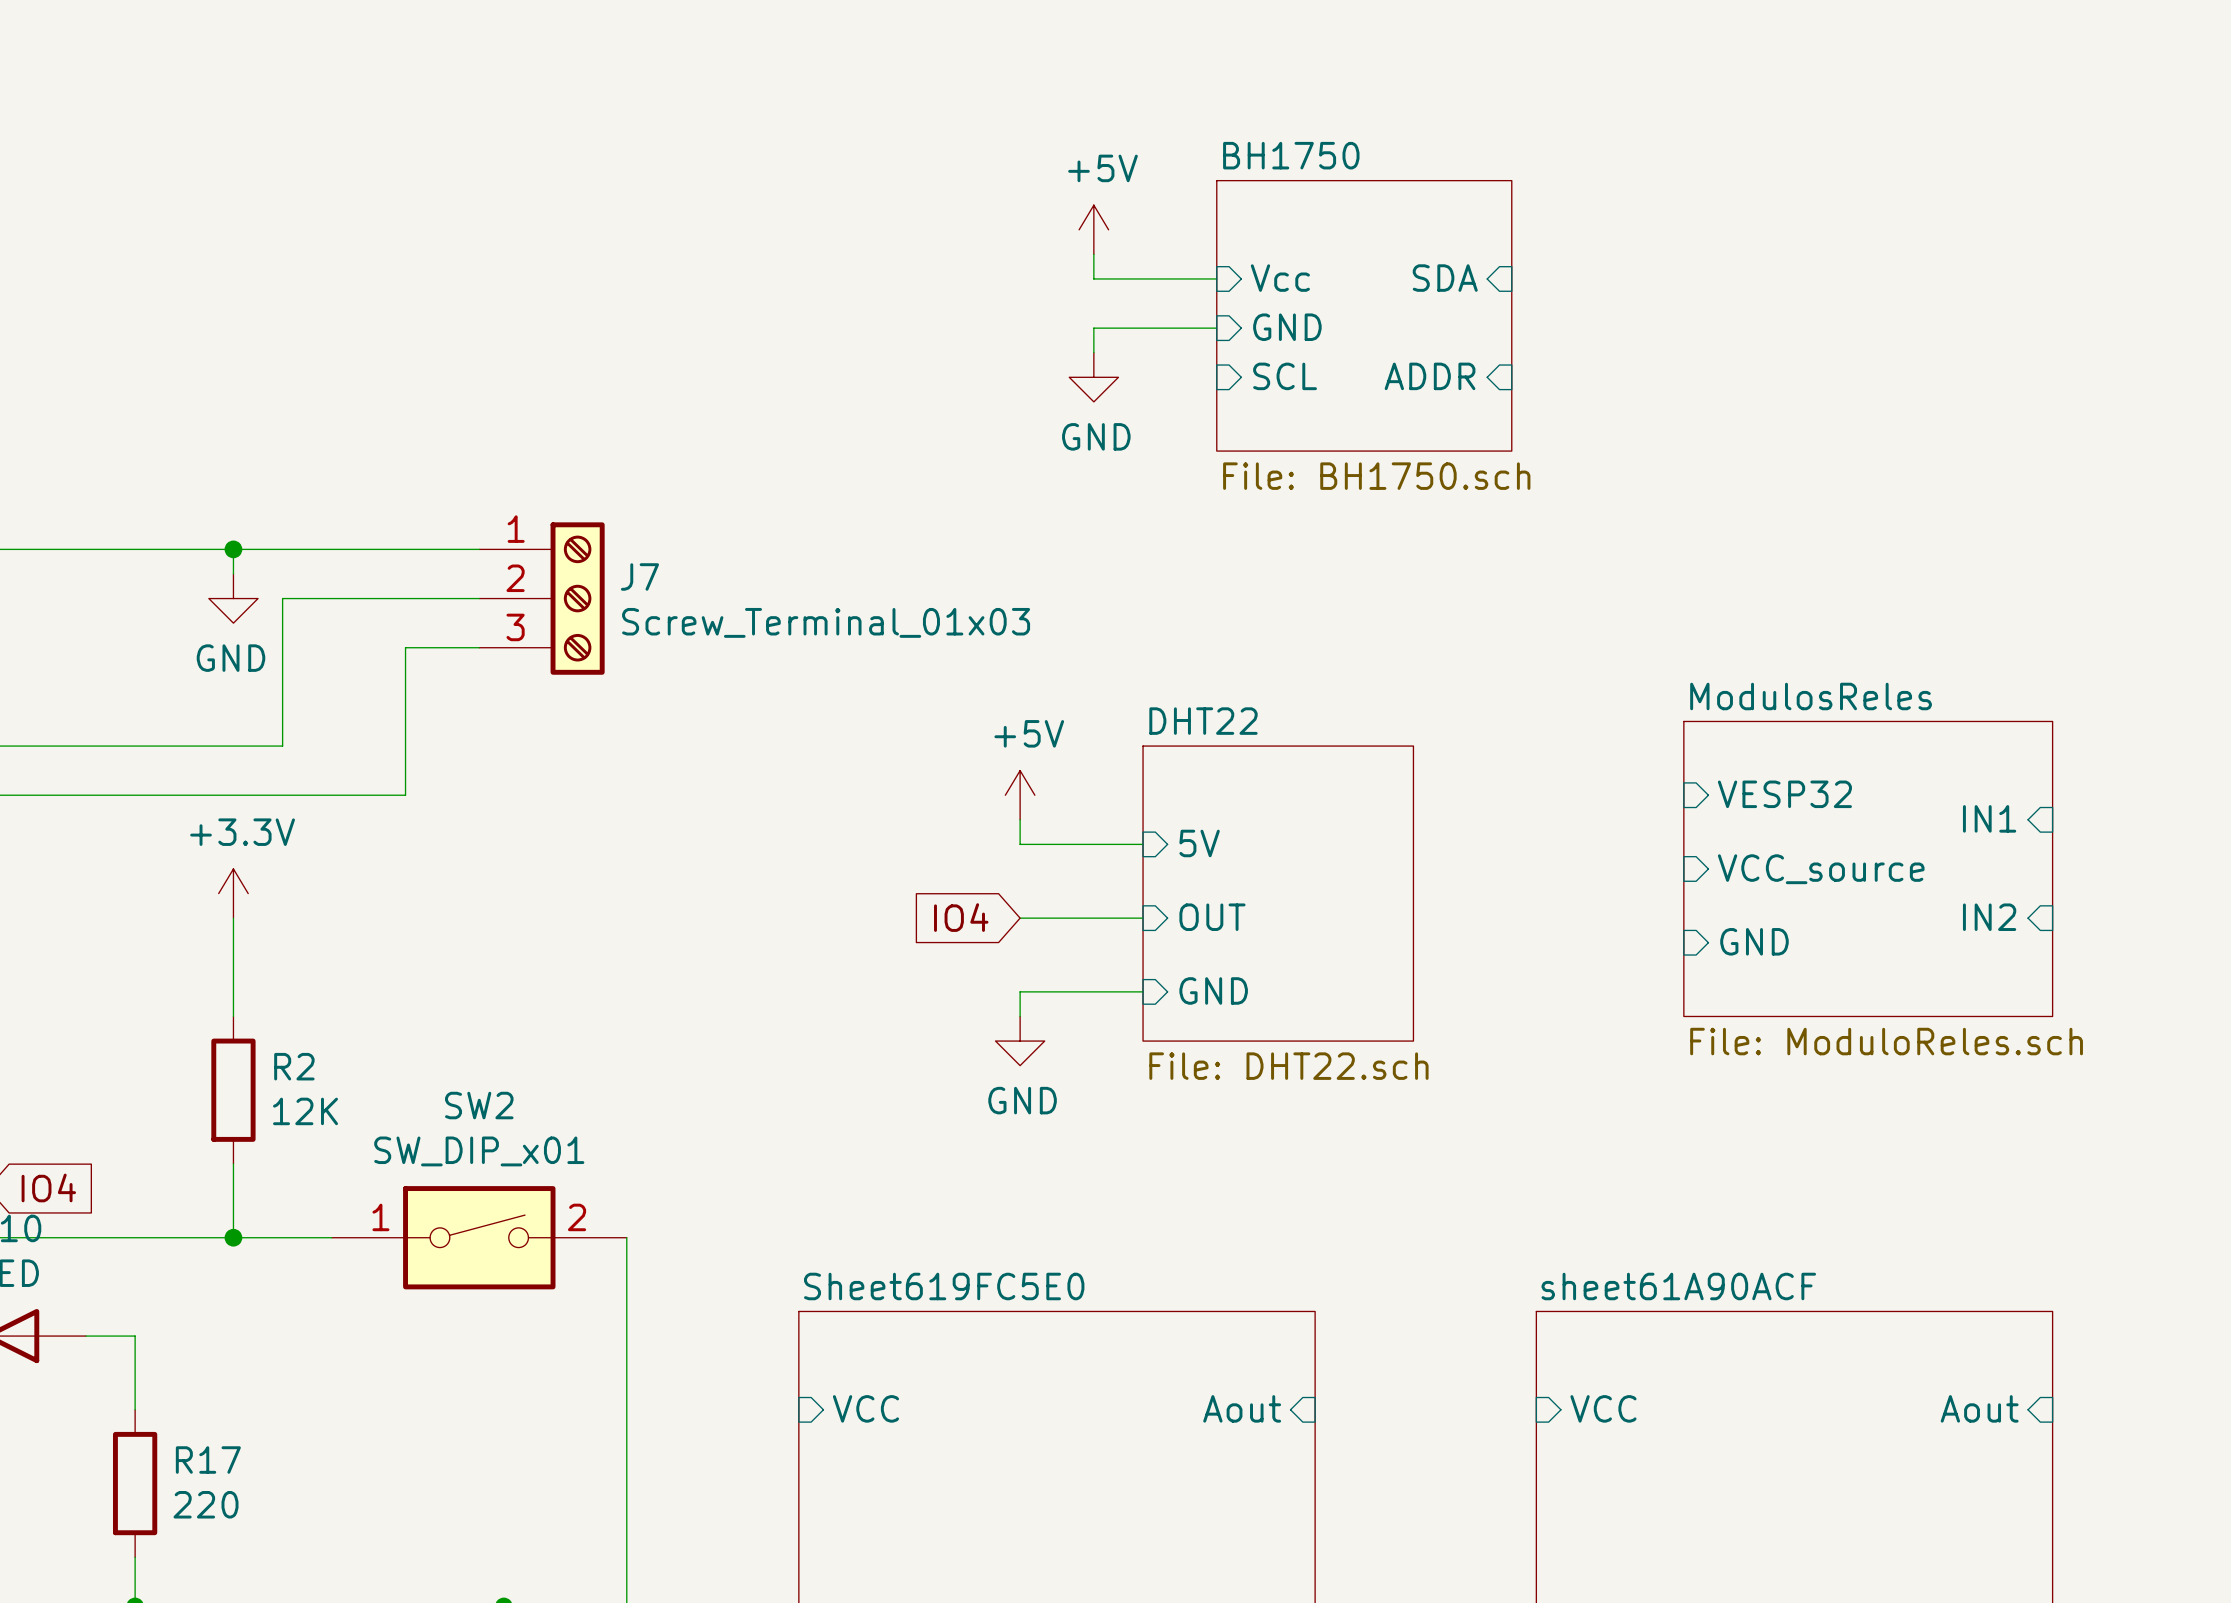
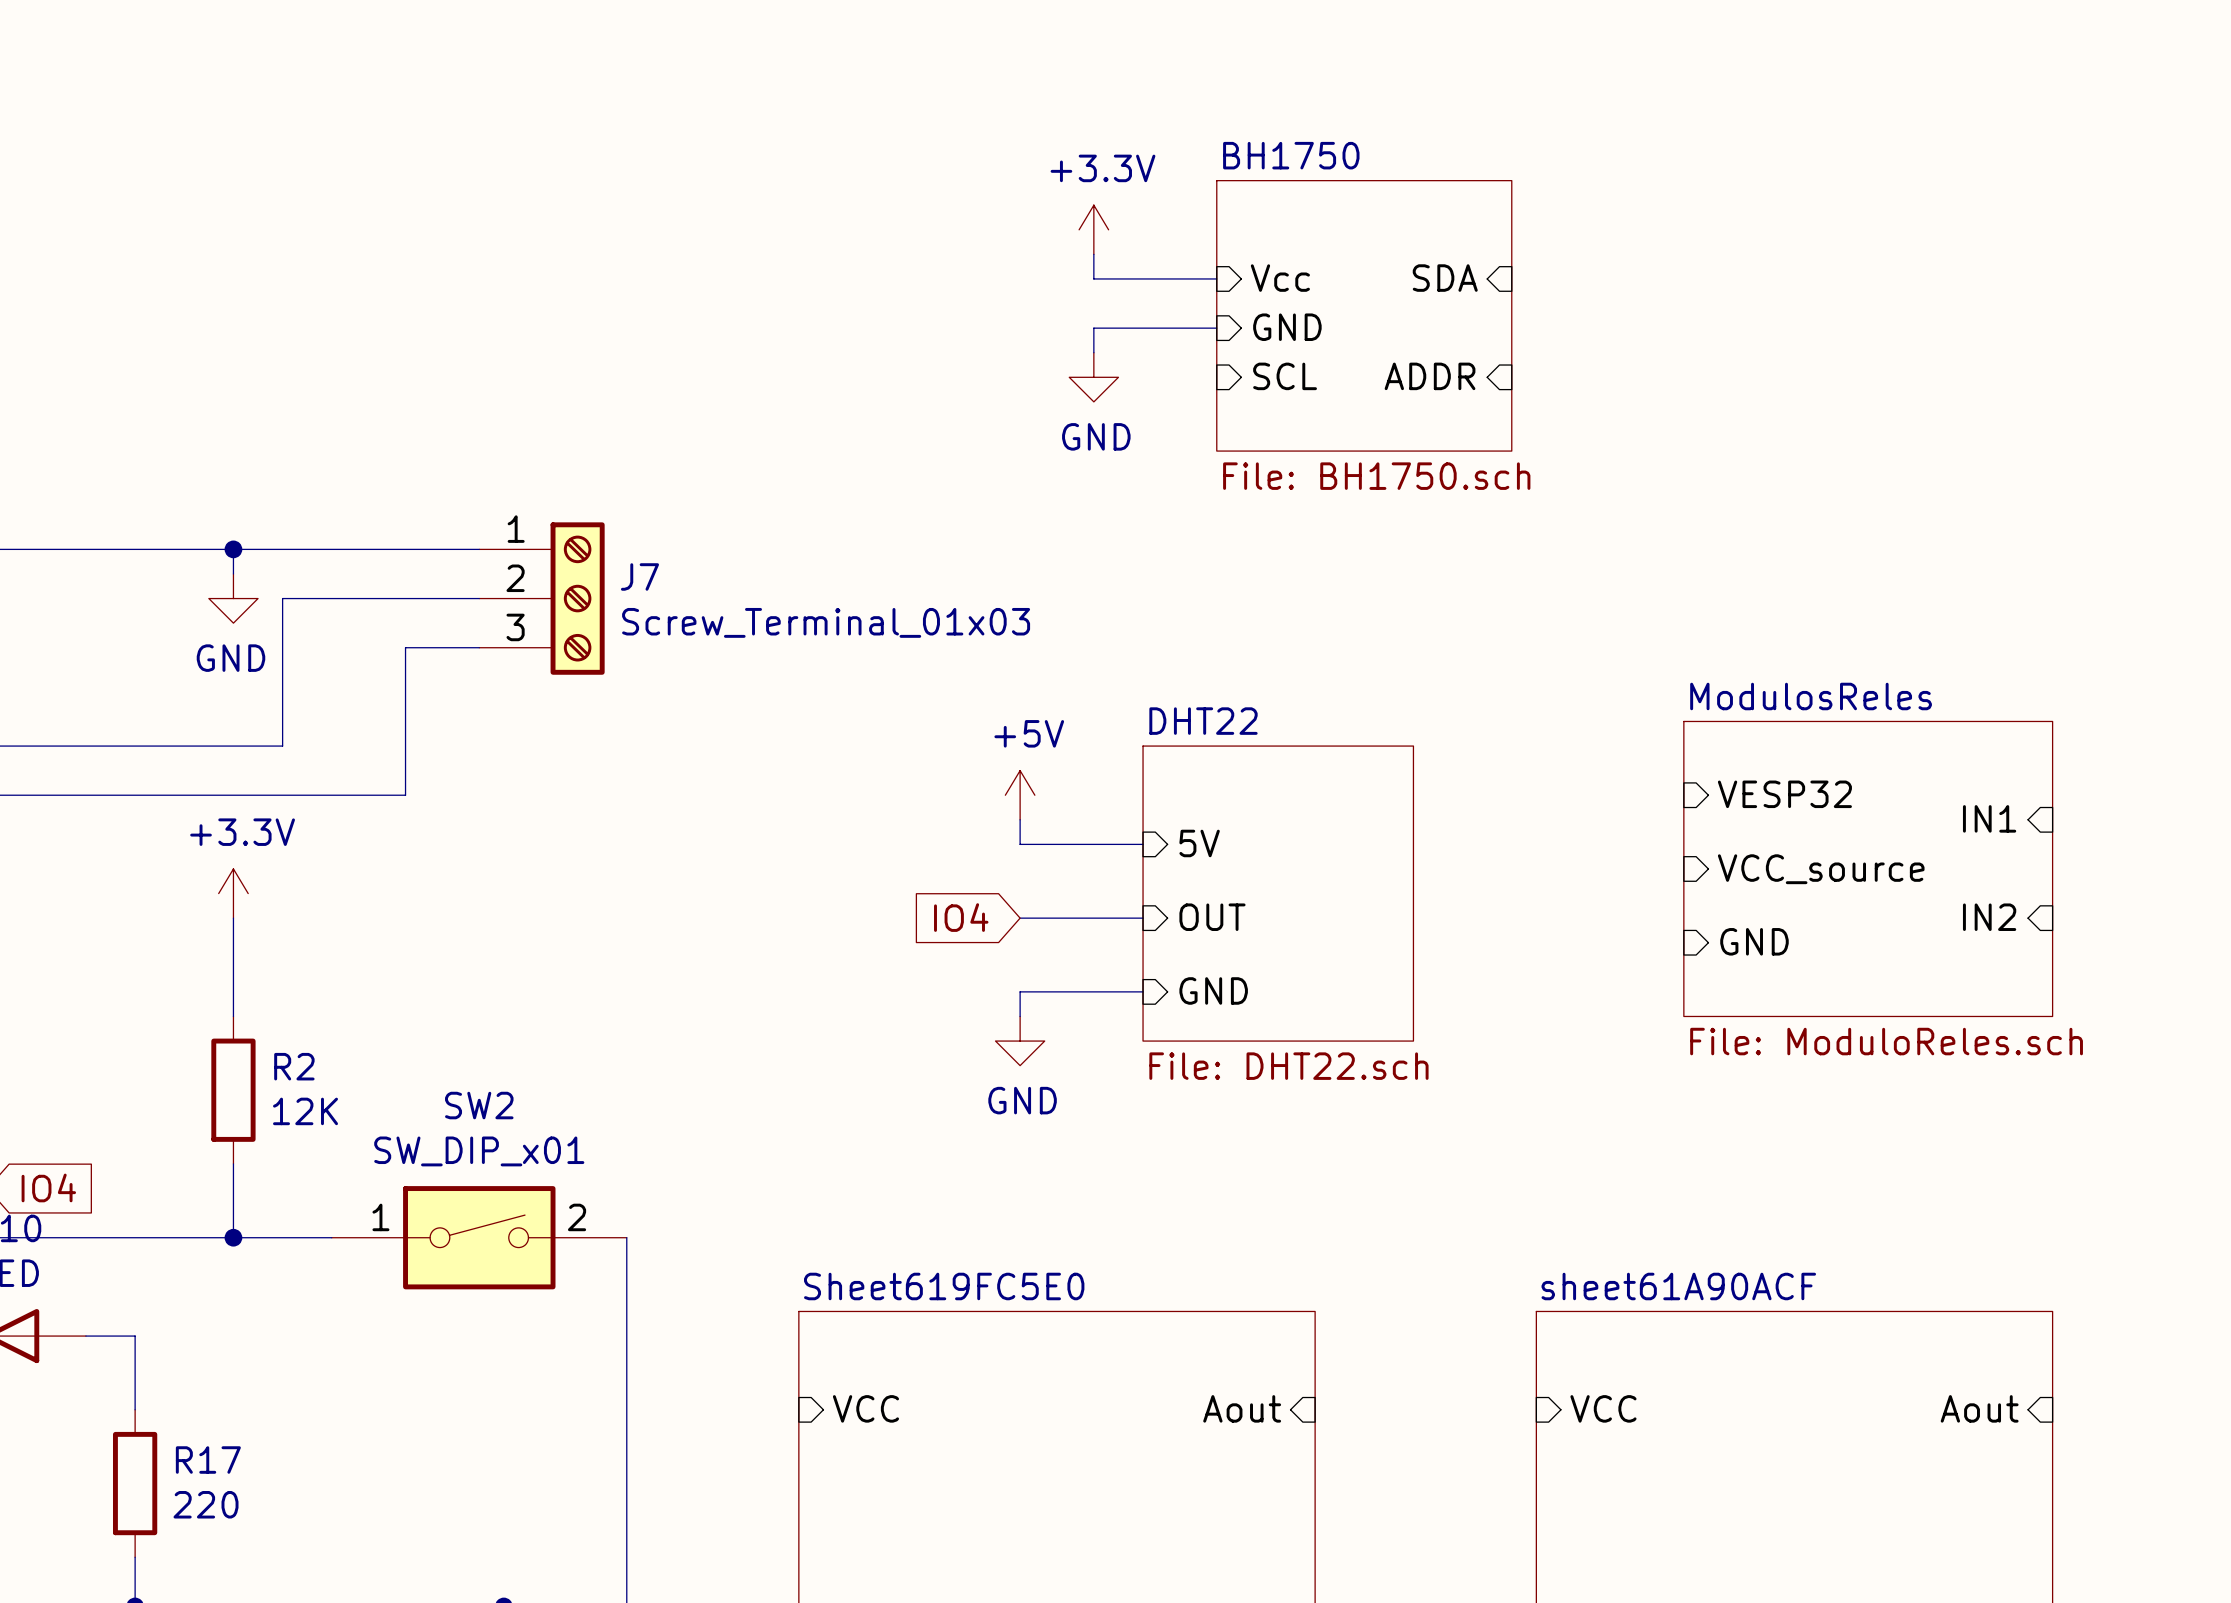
power symbol: +5V (1093, 229) -> +3.3V (1093, 229)

